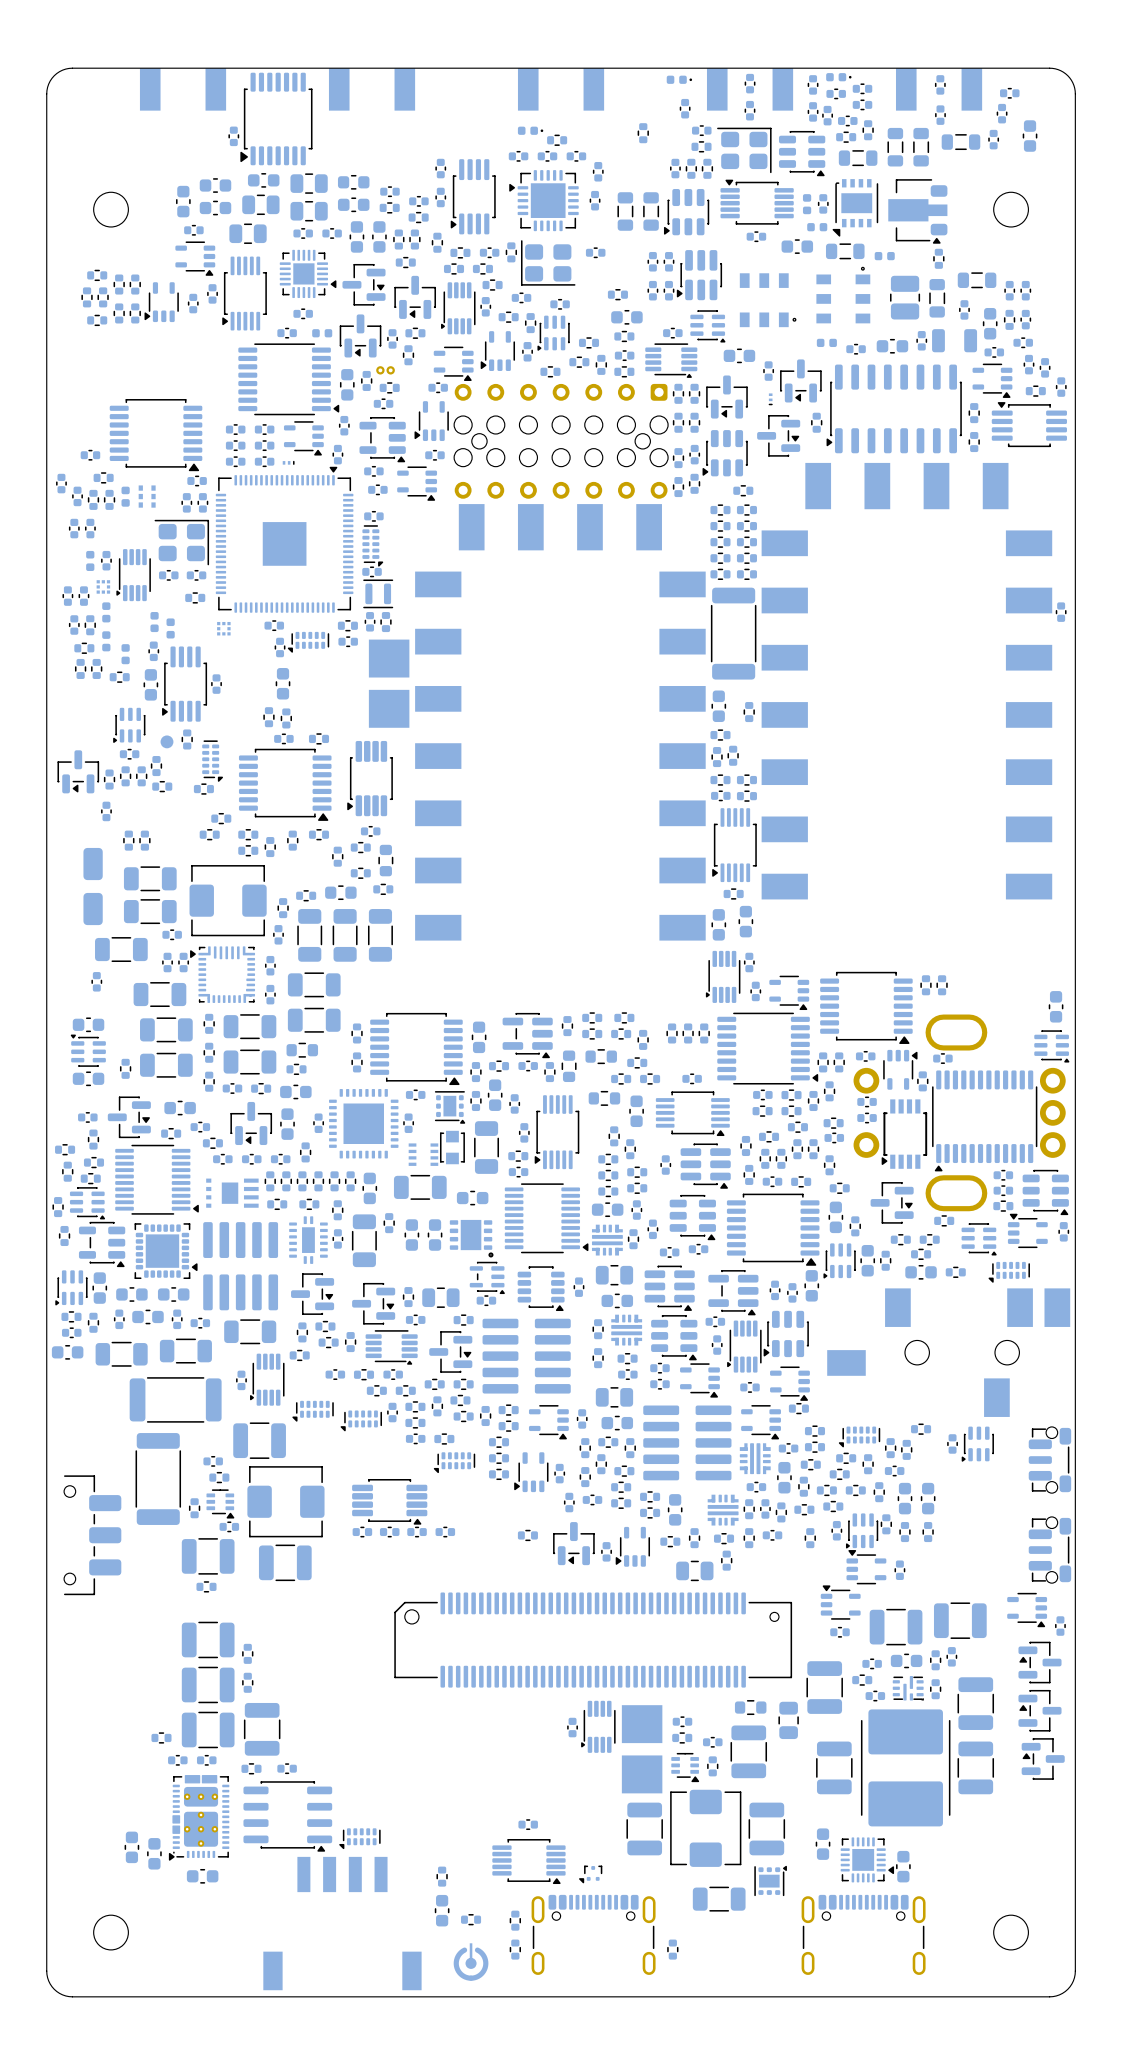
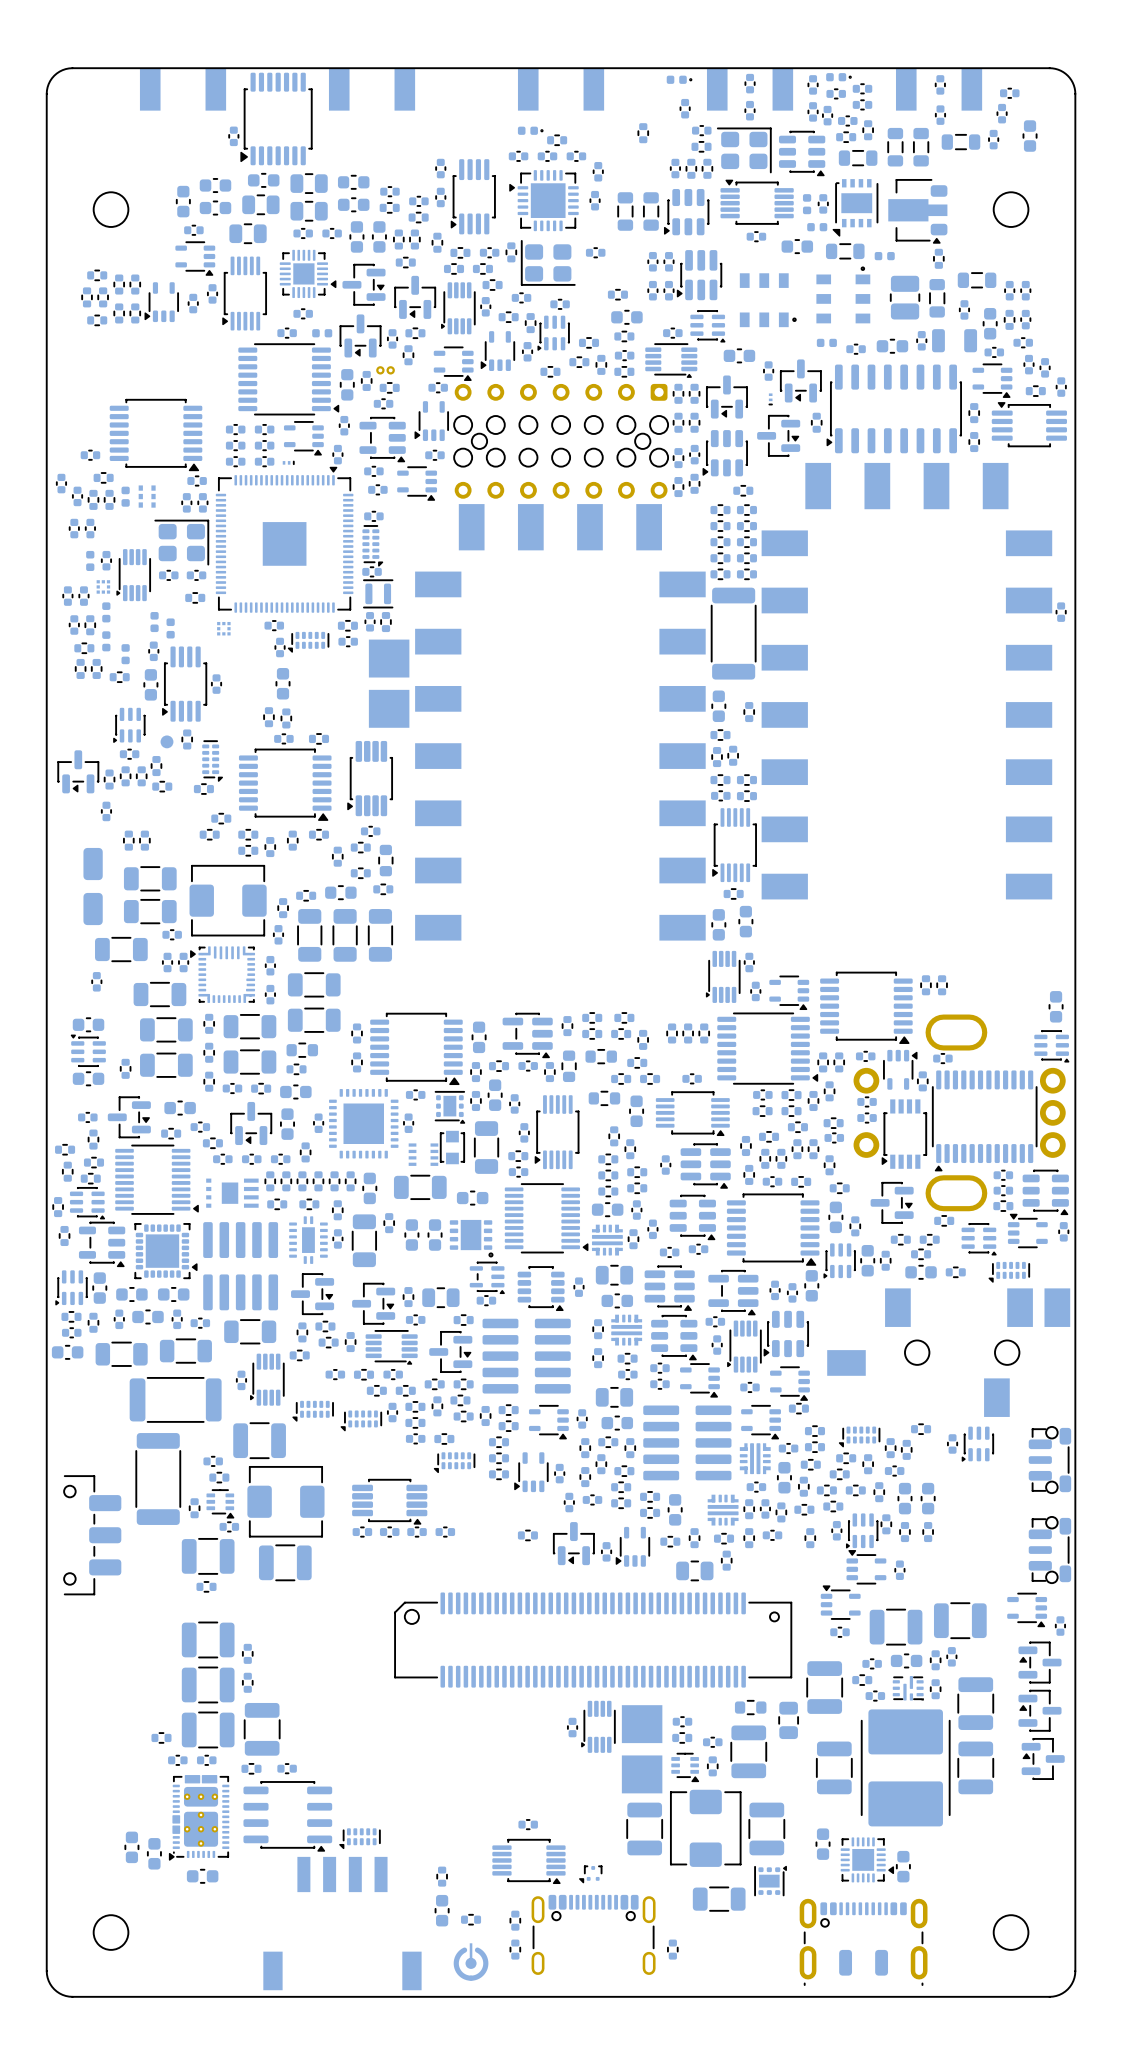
part footprint: [801, 1894, 926, 1975] -> [799, 1898, 928, 1986]

